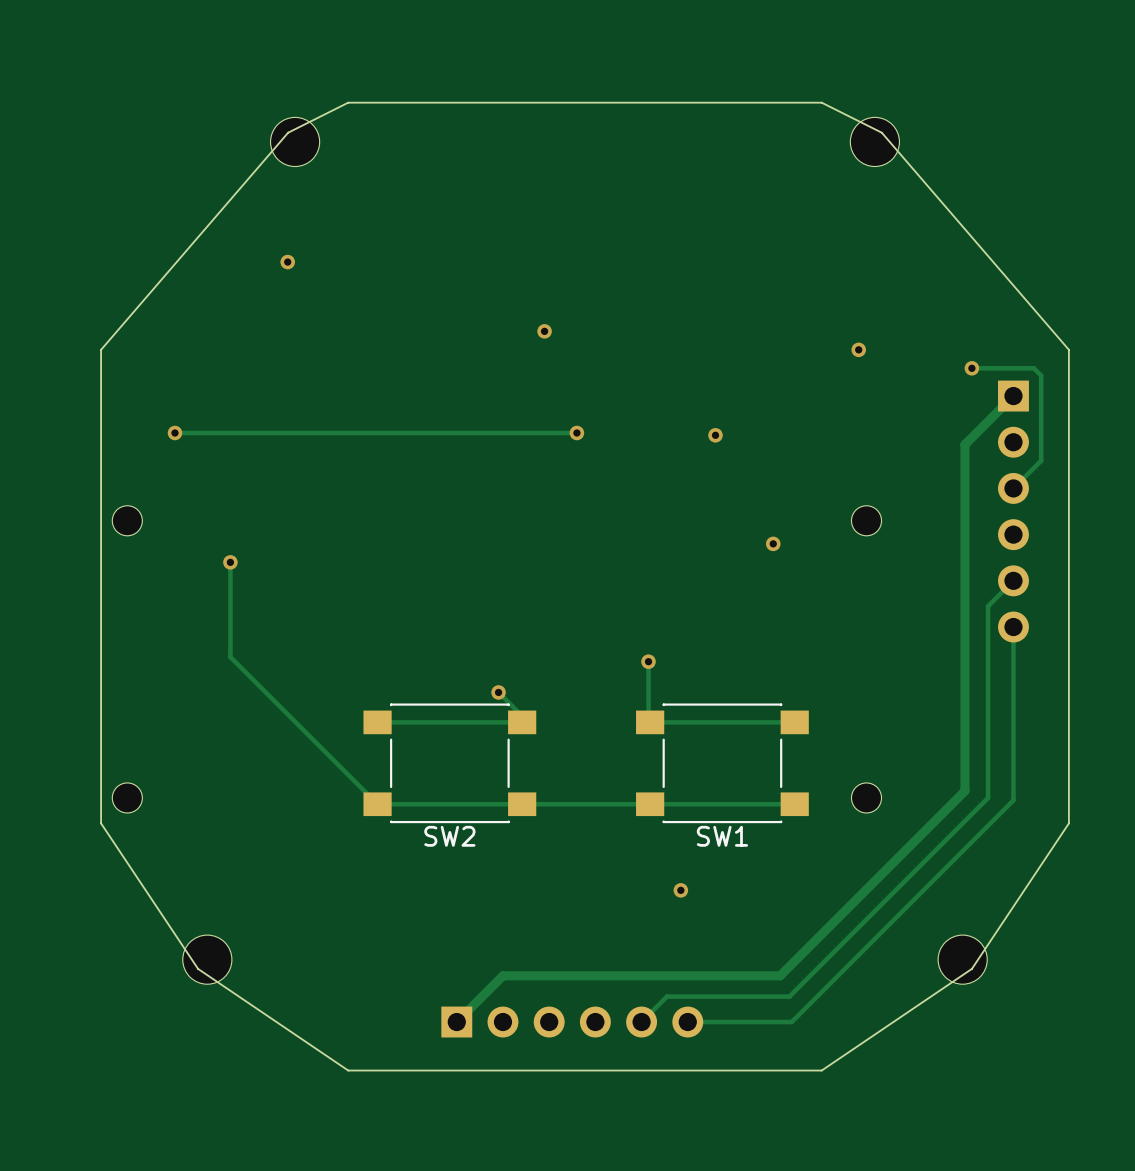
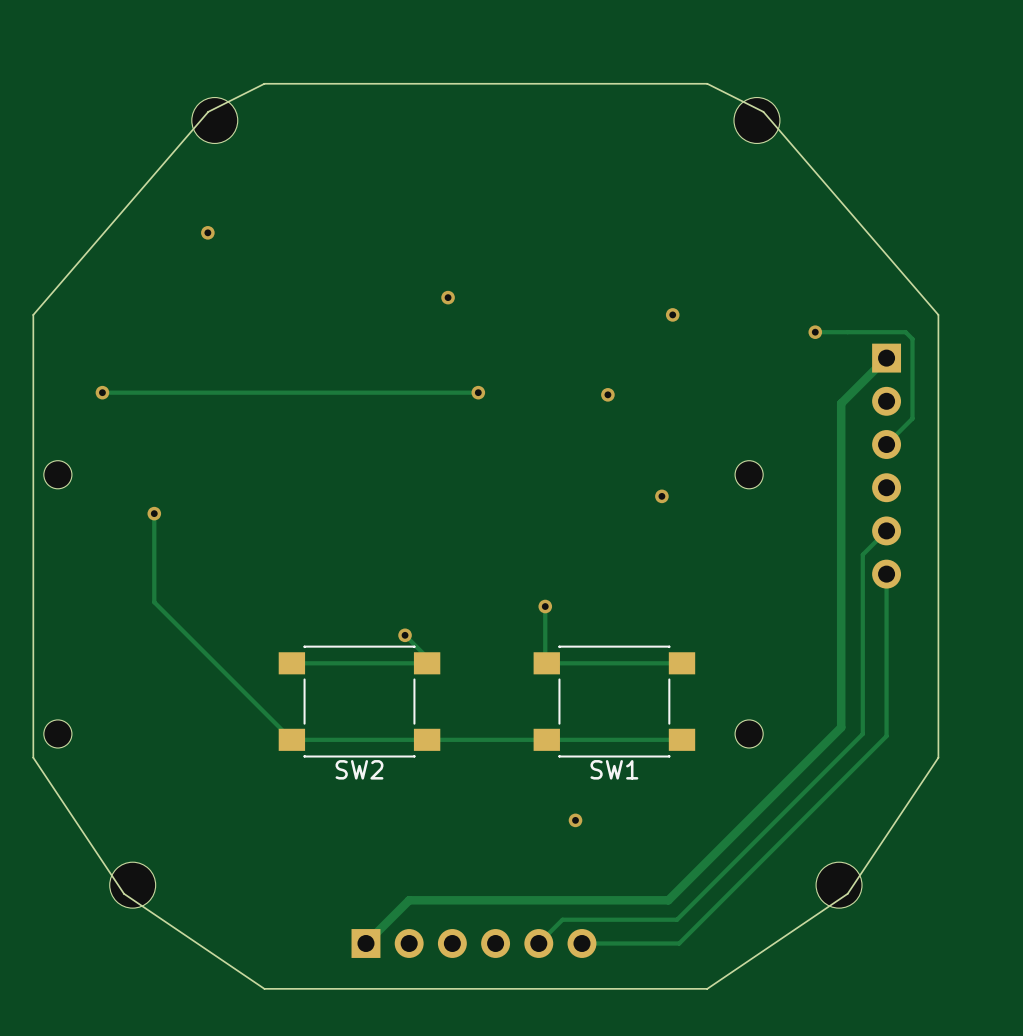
via: none -> (672, 314)
via: (858, 349) -> none
track: none -> (847, 332) (815, 332)
via position: (971, 368) -> (815, 332)

